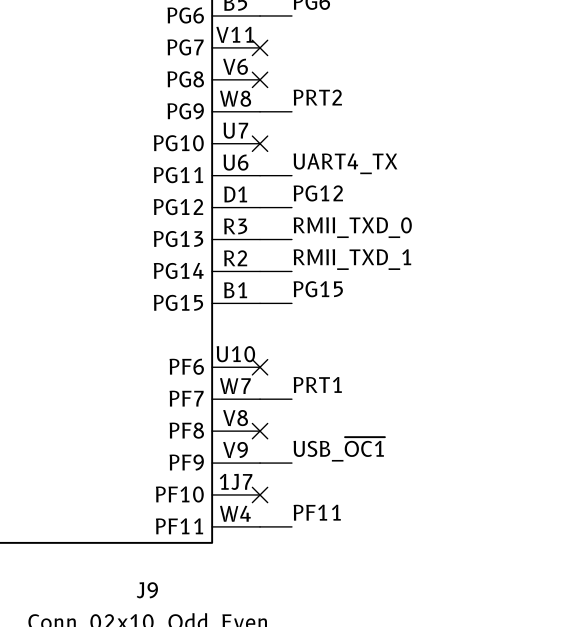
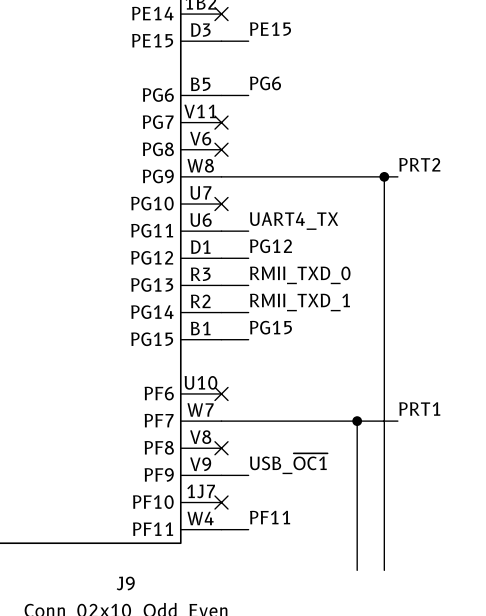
label position: PRT2 (317, 97) -> PRT2 (419, 164)
wire: none -> (248, 176) (397, 176)
wire: none -> (384, 176) (384, 570)
junction: none -> (384, 176)
label position: PRT1 (317, 384) -> PRT1 (419, 409)
wire: none -> (248, 421) (397, 421)
wire: none -> (357, 421) (357, 570)
junction: none -> (357, 421)

